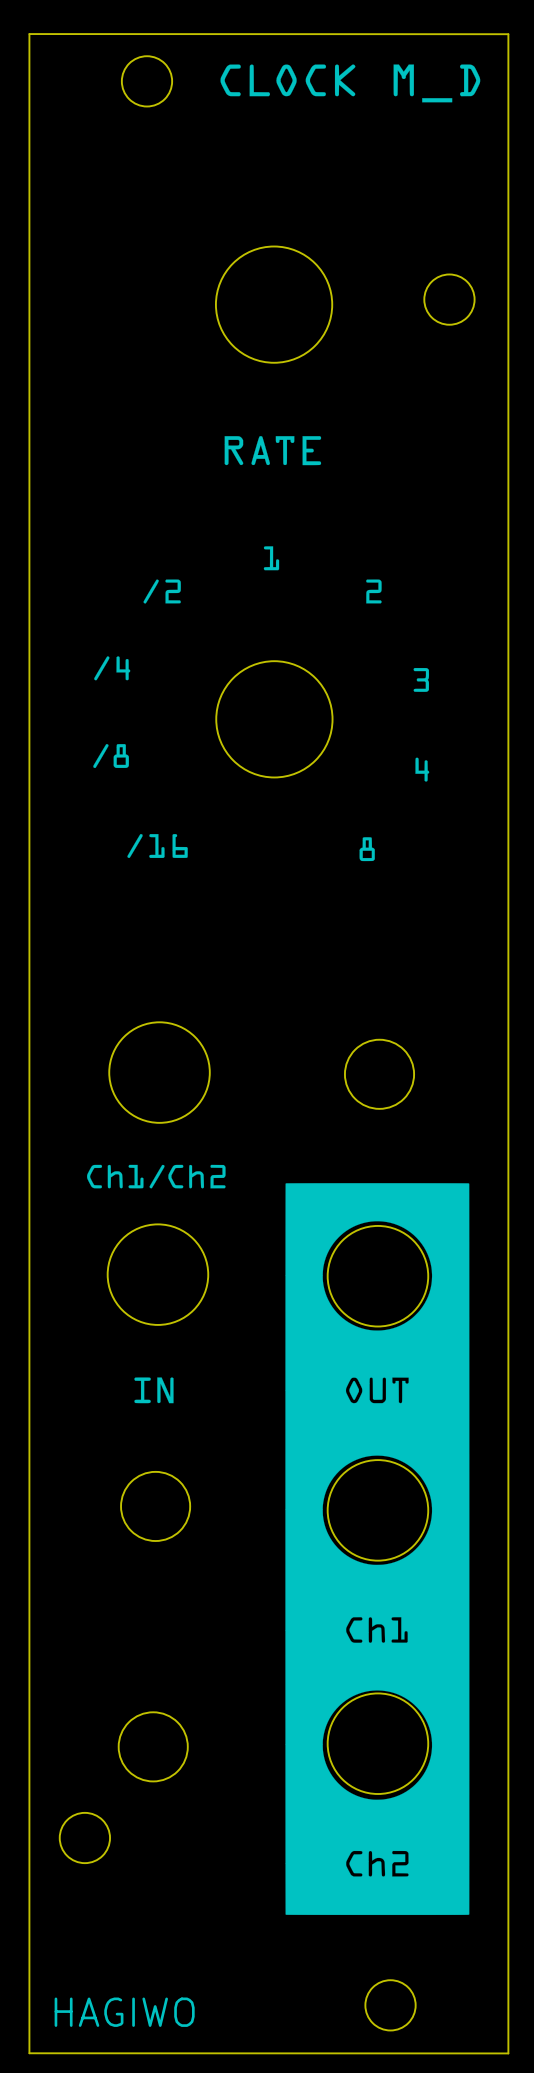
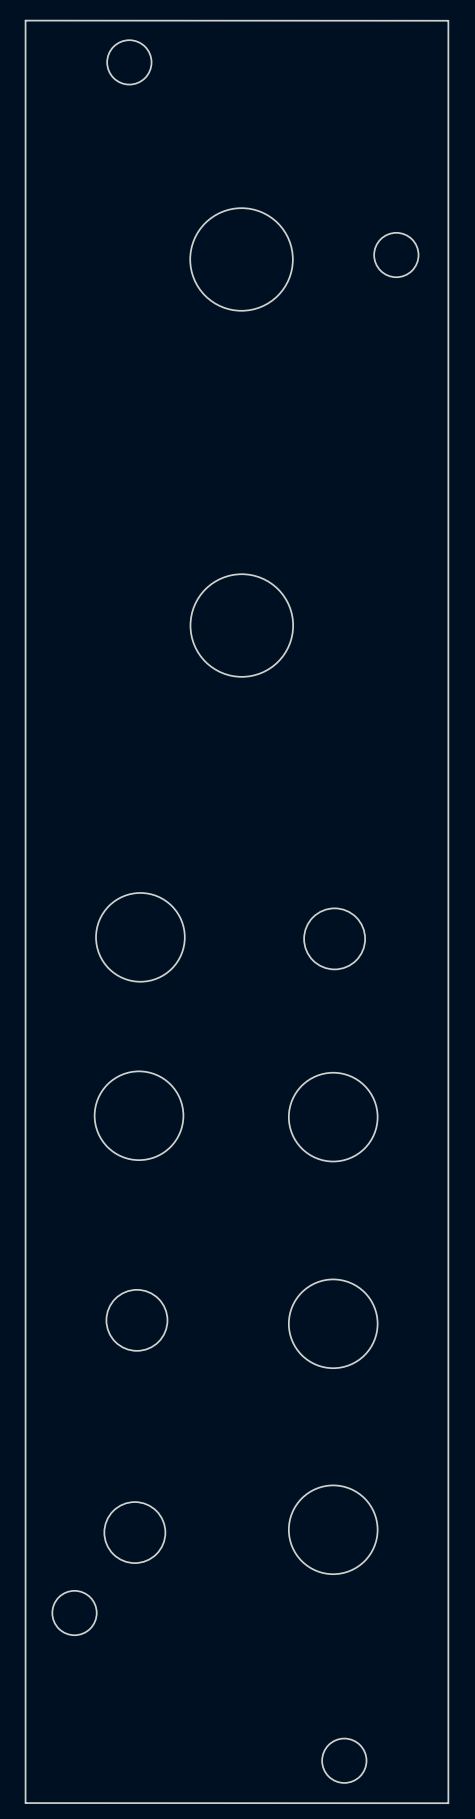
drawing: [87, 64, 481, 1916] -> none
text: HAGIWO (124, 2012) -> none

